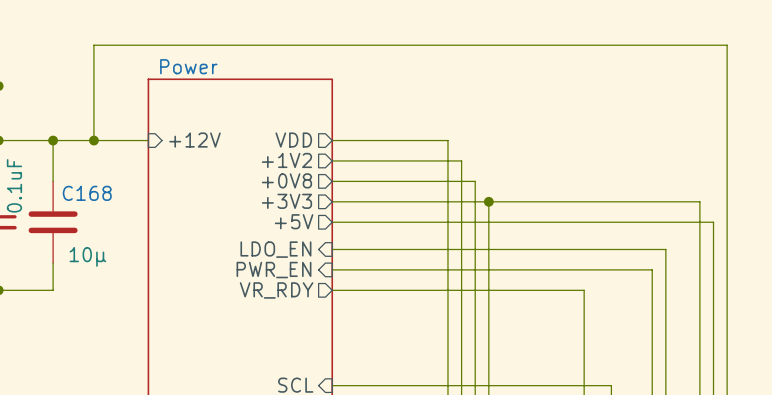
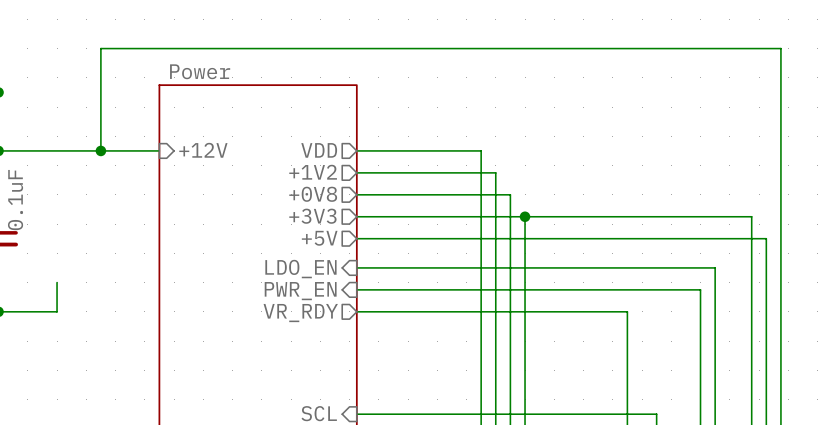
wire: (53, 140) (53, 181) -> none
junction: (53, 140) -> none
C168: 10µ (53, 222) -> none

